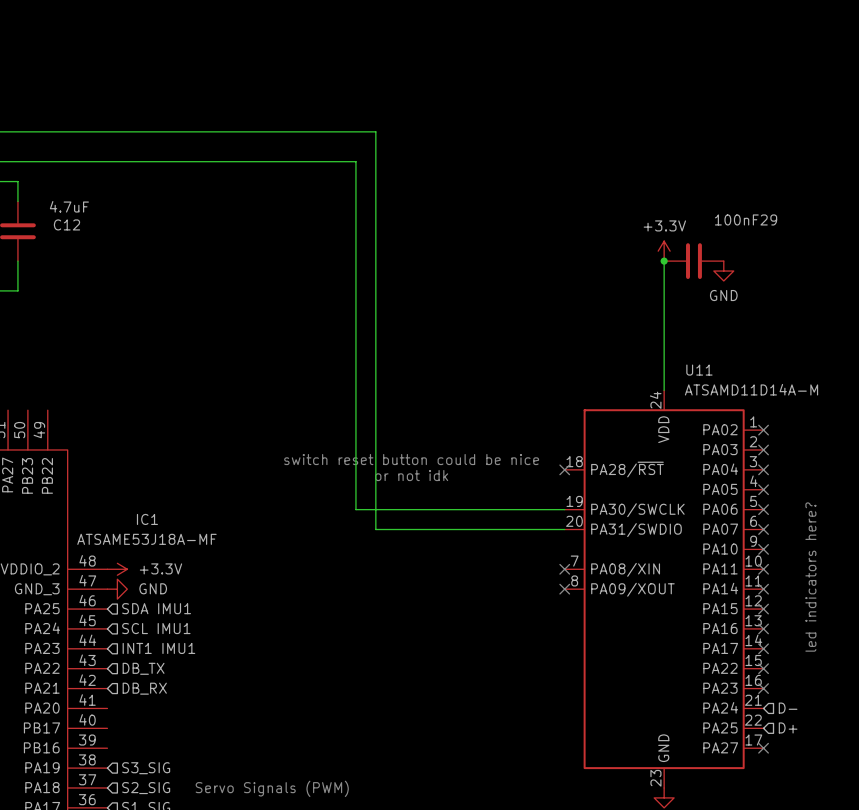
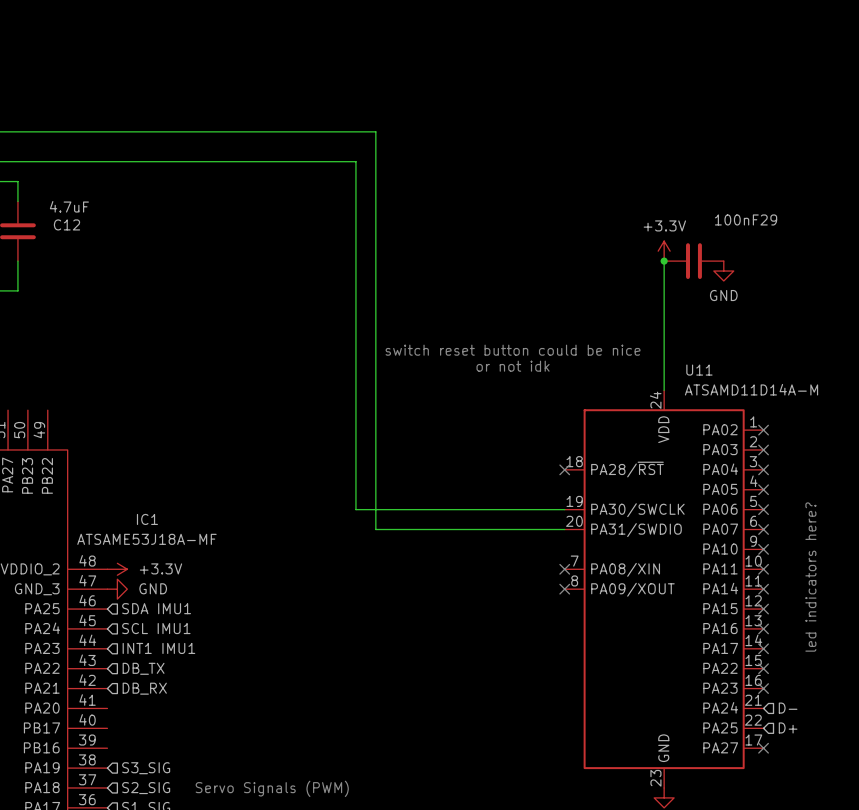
text position: switch reset button could be nice (411, 459) -> switch reset button could be nice (513, 350)
text position: or not idk (411, 475) -> or not idk (513, 366)

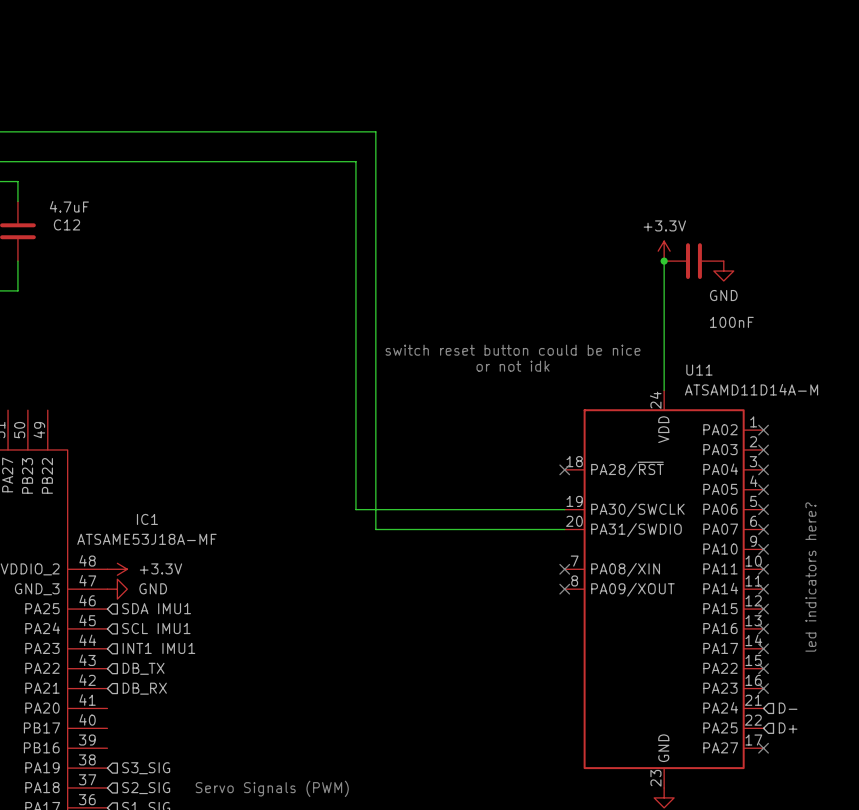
100nF29 name: 100nF29 (746, 219) -> 100nF (731, 322)

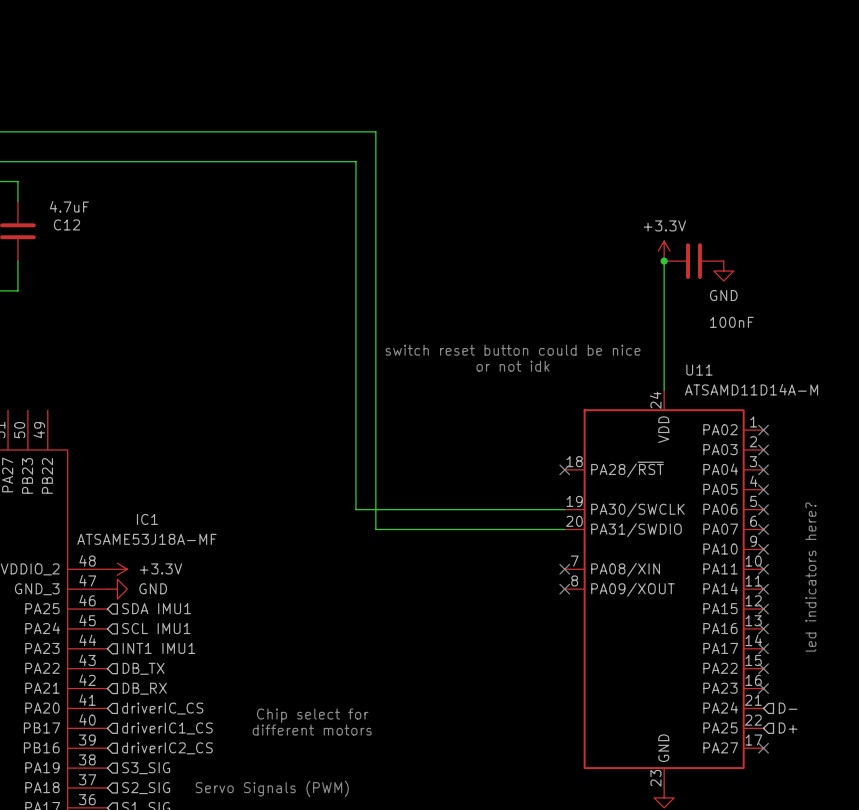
hierarchical label: none -> driverIC_CS (162, 708)
text: none -> Chip select for (312, 715)
hierarchical label: none -> driverIC1_CS (167, 728)
text: none -> different motors (312, 730)
hierarchical label: none -> driverIC2_CS (167, 748)

